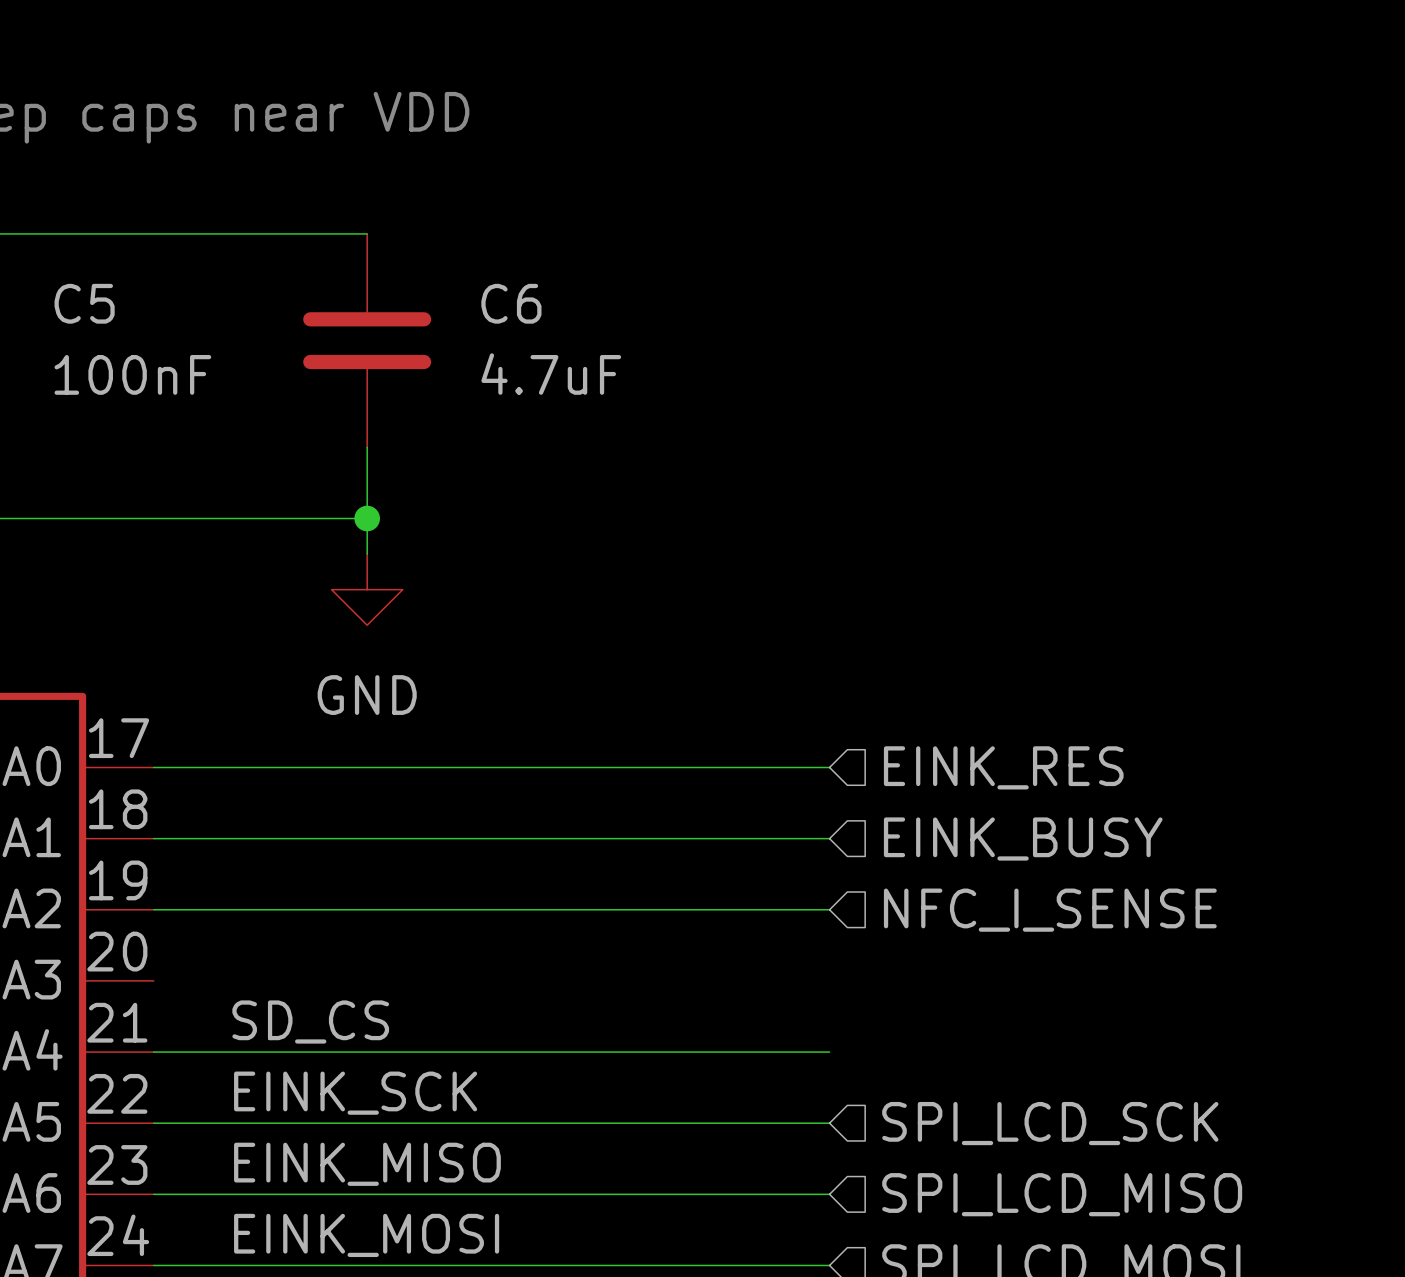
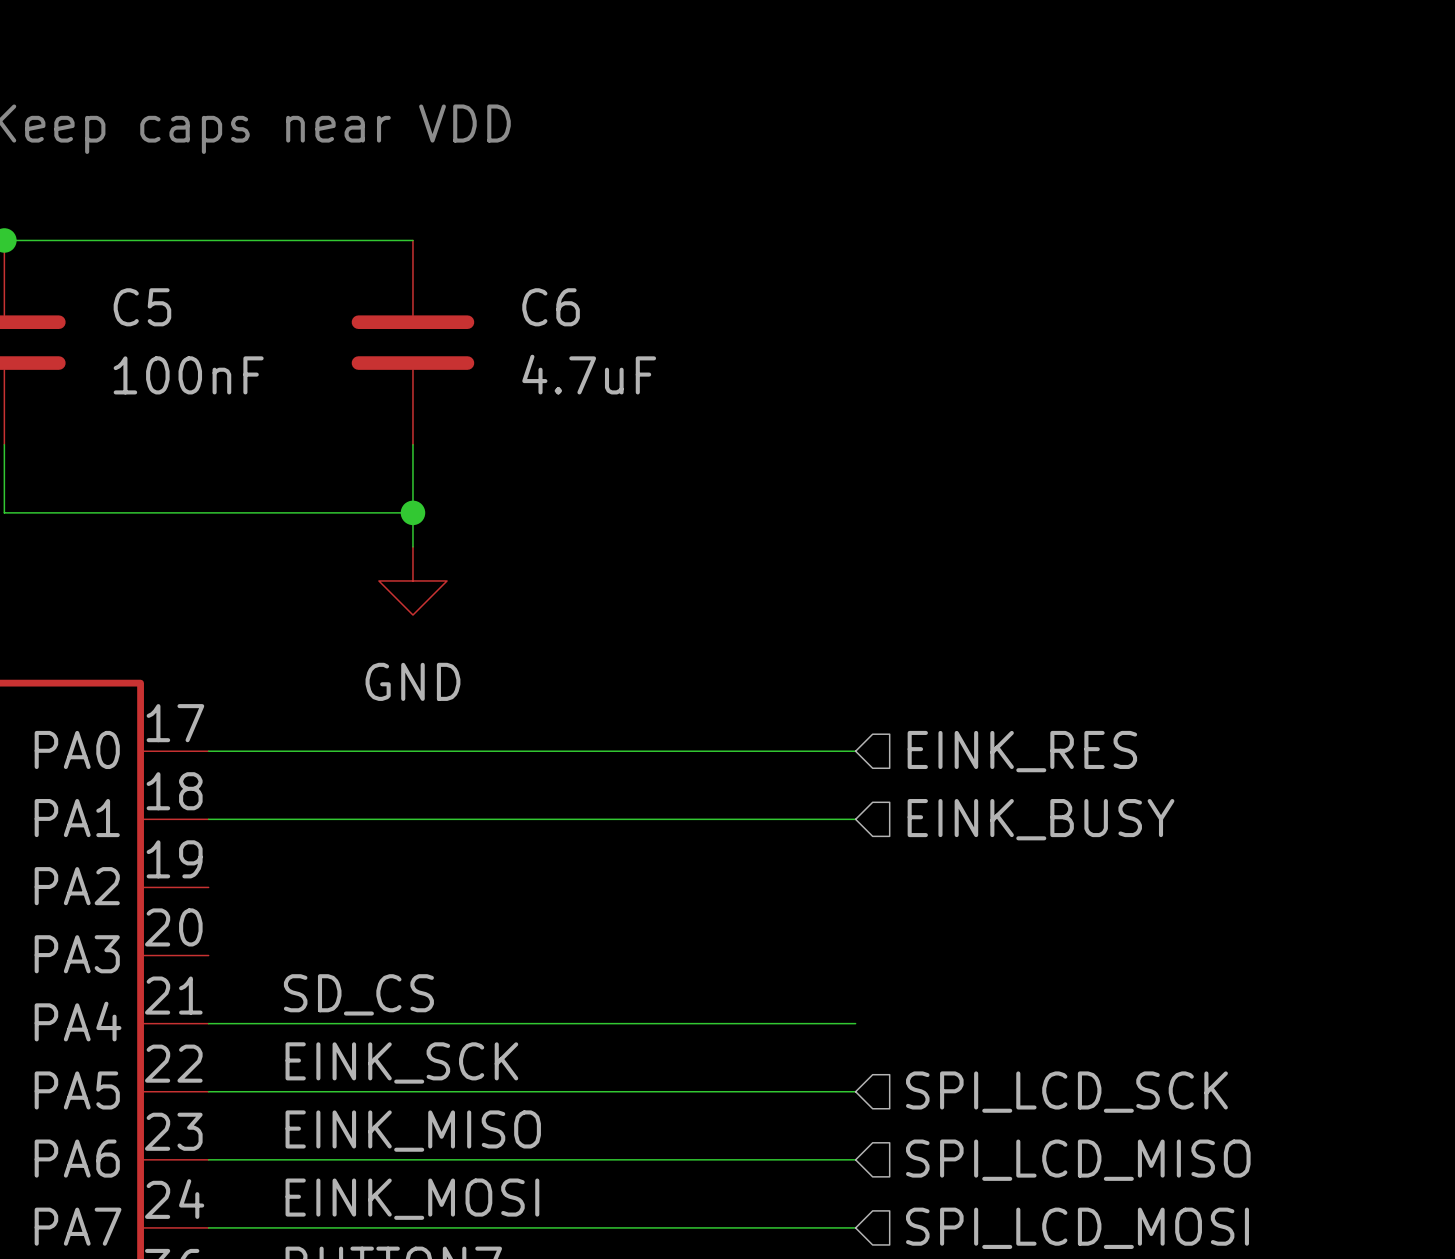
wire: (153, 909) (829, 909) -> none
hierarchical label: NFC_I_SENSE (1050, 910) -> none

